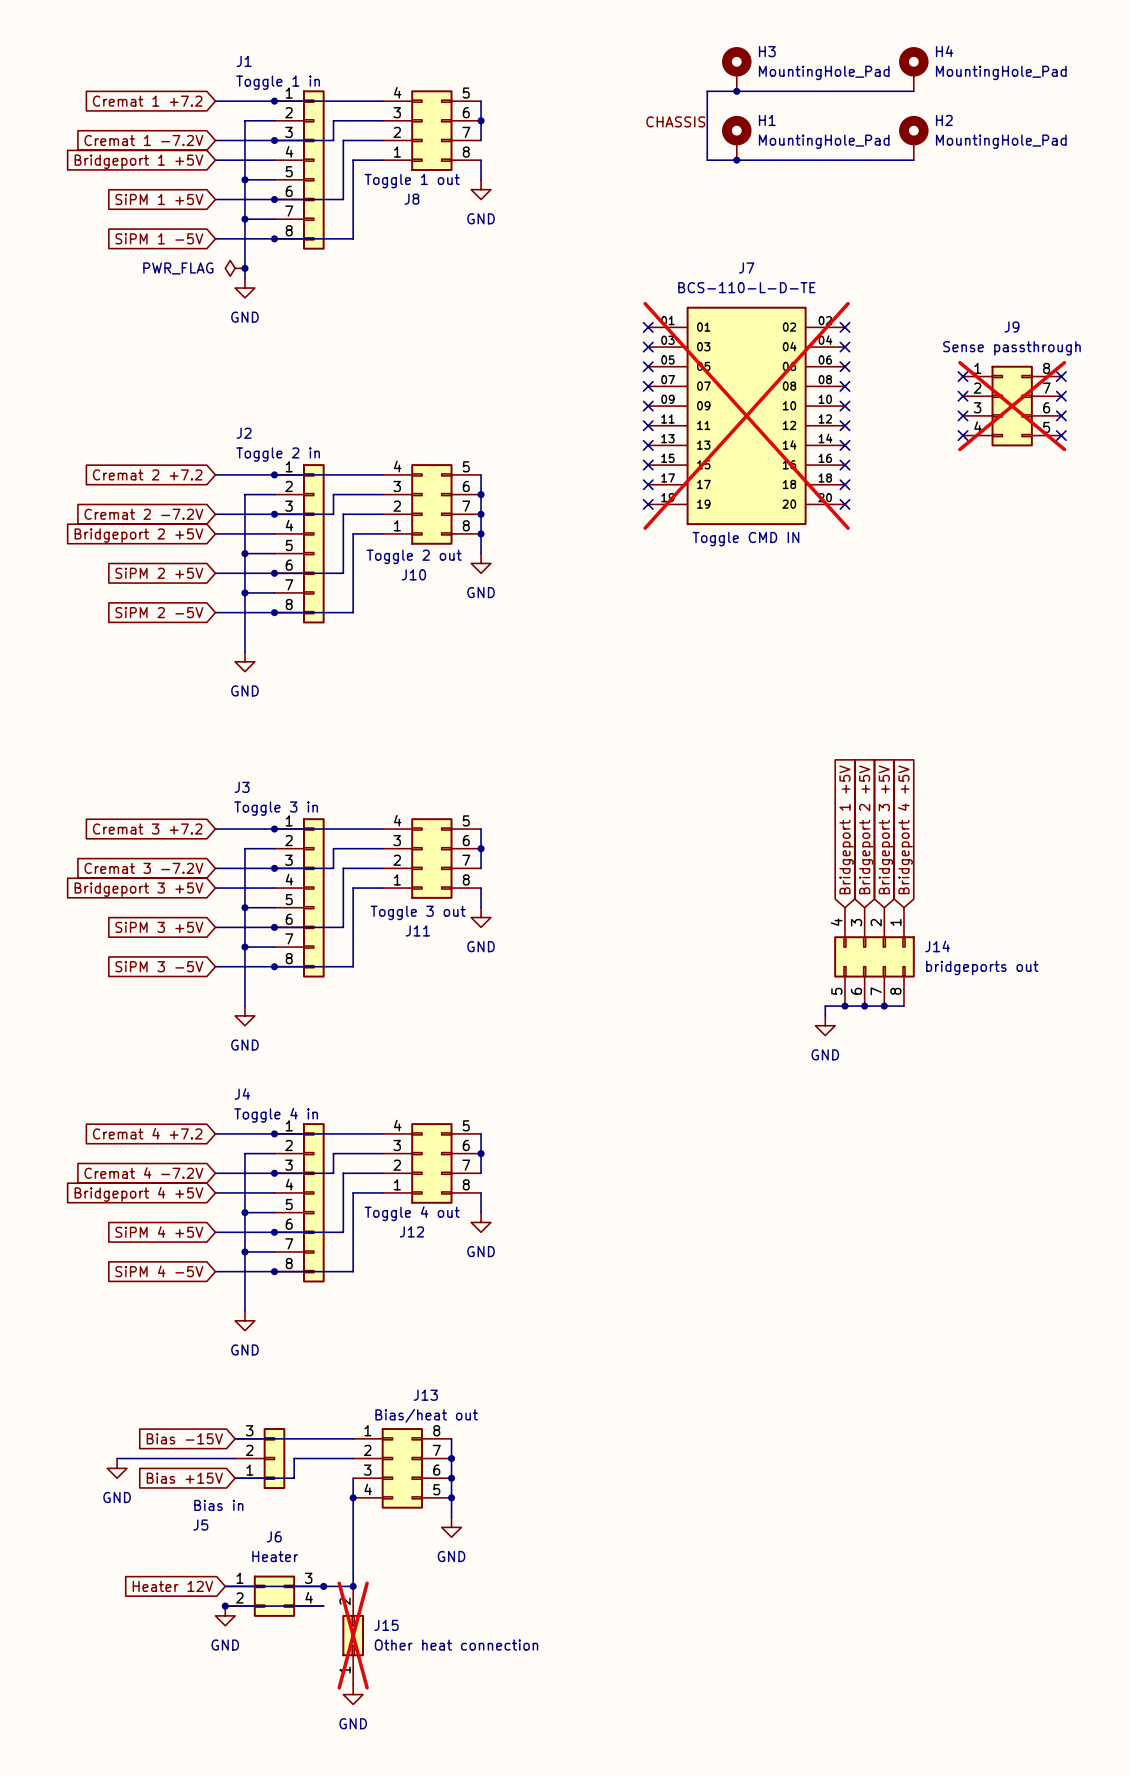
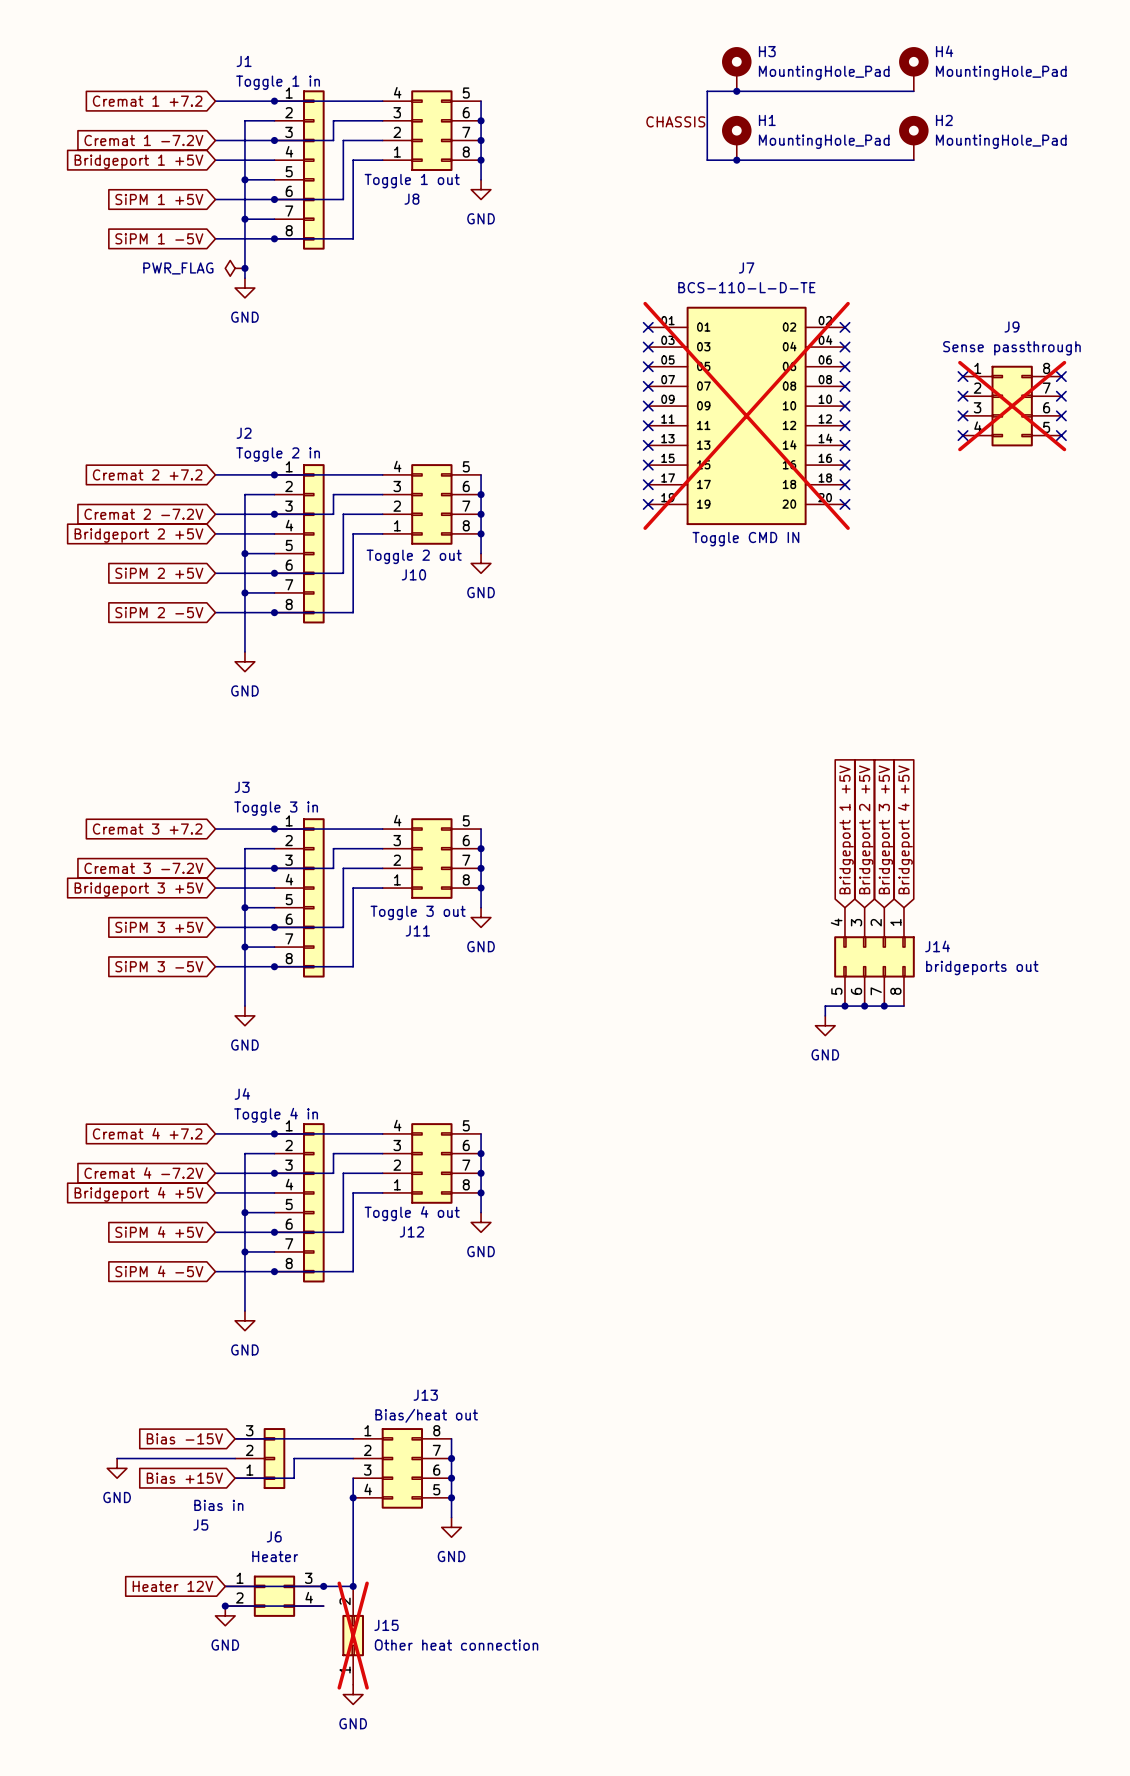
wire: none -> (481, 140) (481, 160)
junction: none -> (481, 140)
junction: none -> (481, 160)
wire: none -> (481, 868) (481, 888)
junction: none -> (481, 868)
junction: none -> (481, 888)
wire: none -> (481, 1173) (481, 1192)
junction: none -> (481, 1173)
junction: none -> (481, 1192)

